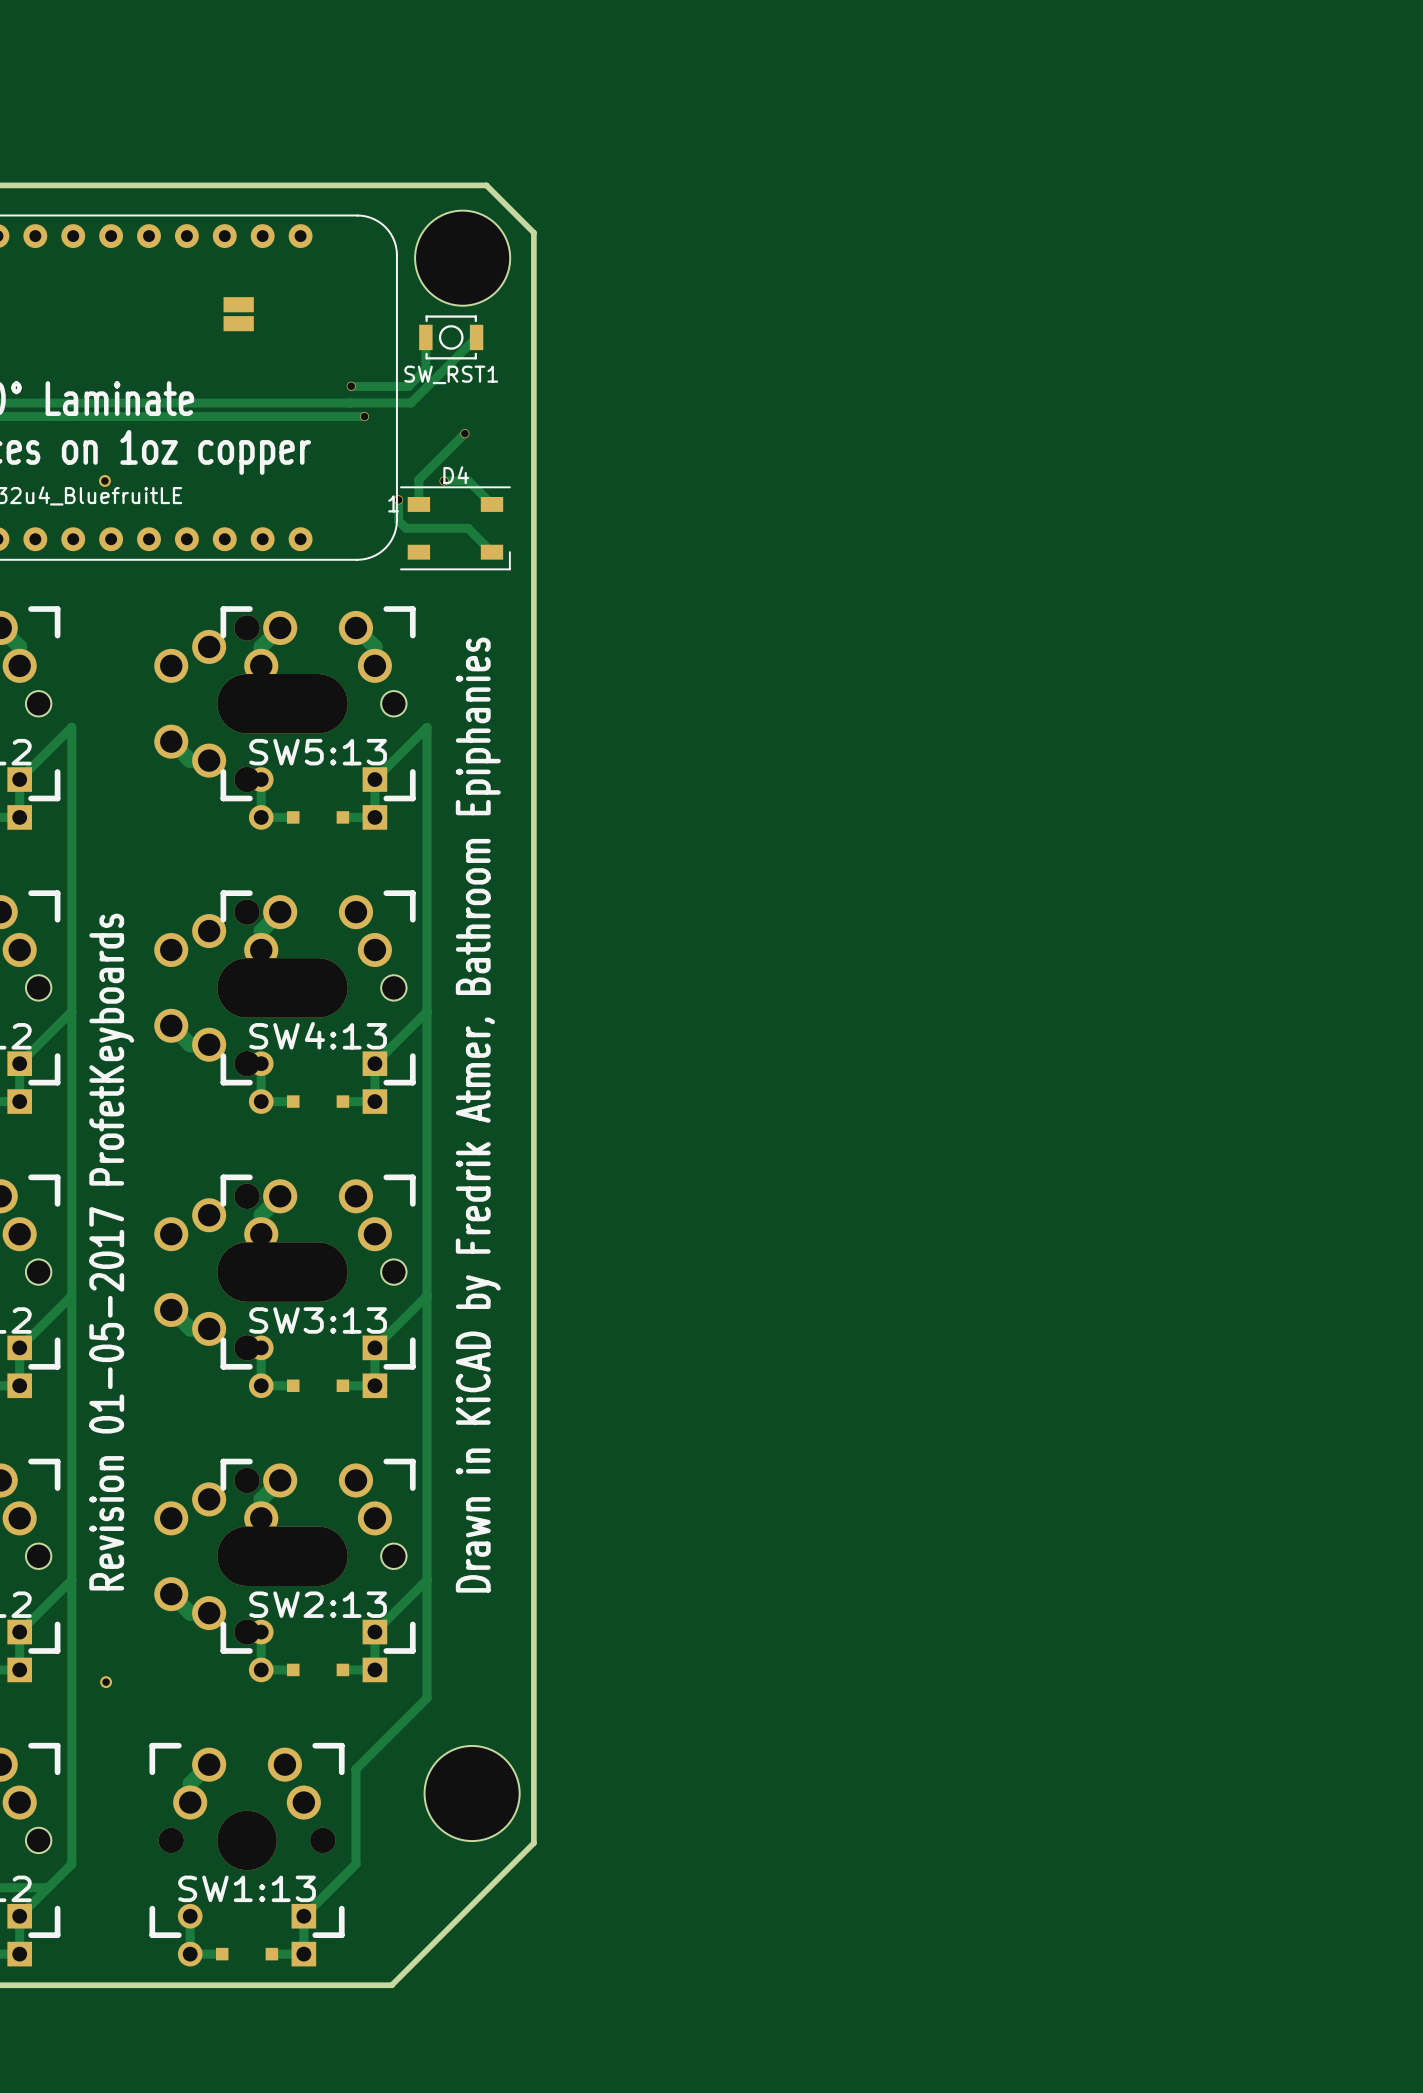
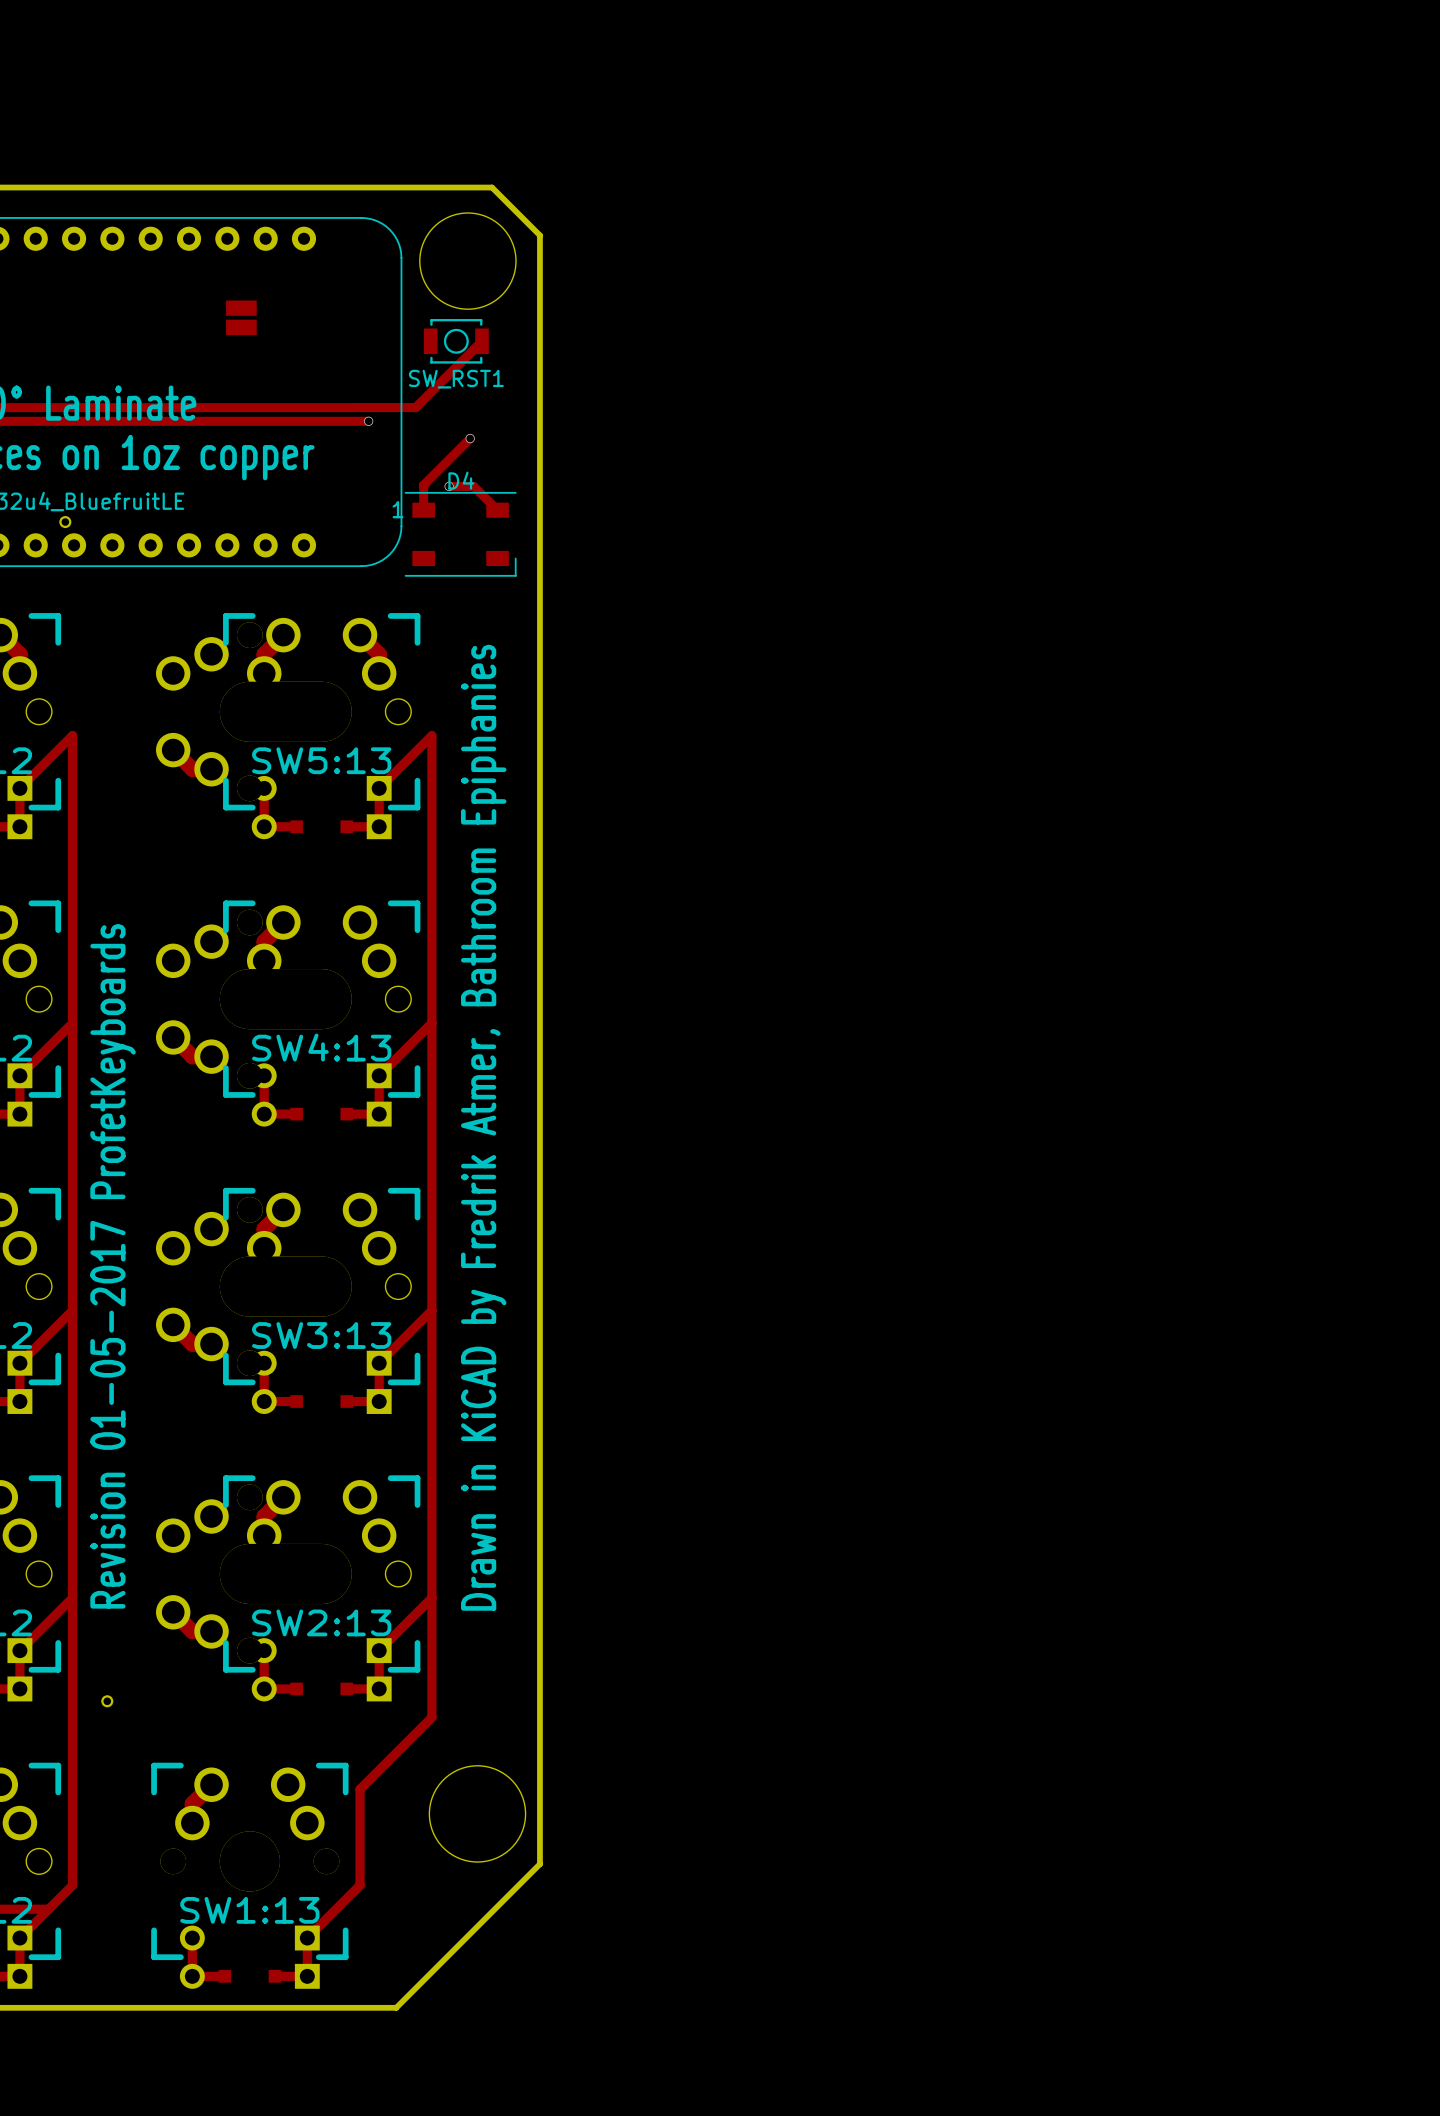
track: (425, 337) (425, 369) (408, 386) (351, 386) -> none
via: (351, 386) -> none
part position: (104, 480) -> (65, 522)
track: (398, 499) (398, 520) (406, 528) (468, 528) (491, 552) -> none
via: (398, 499) -> none

